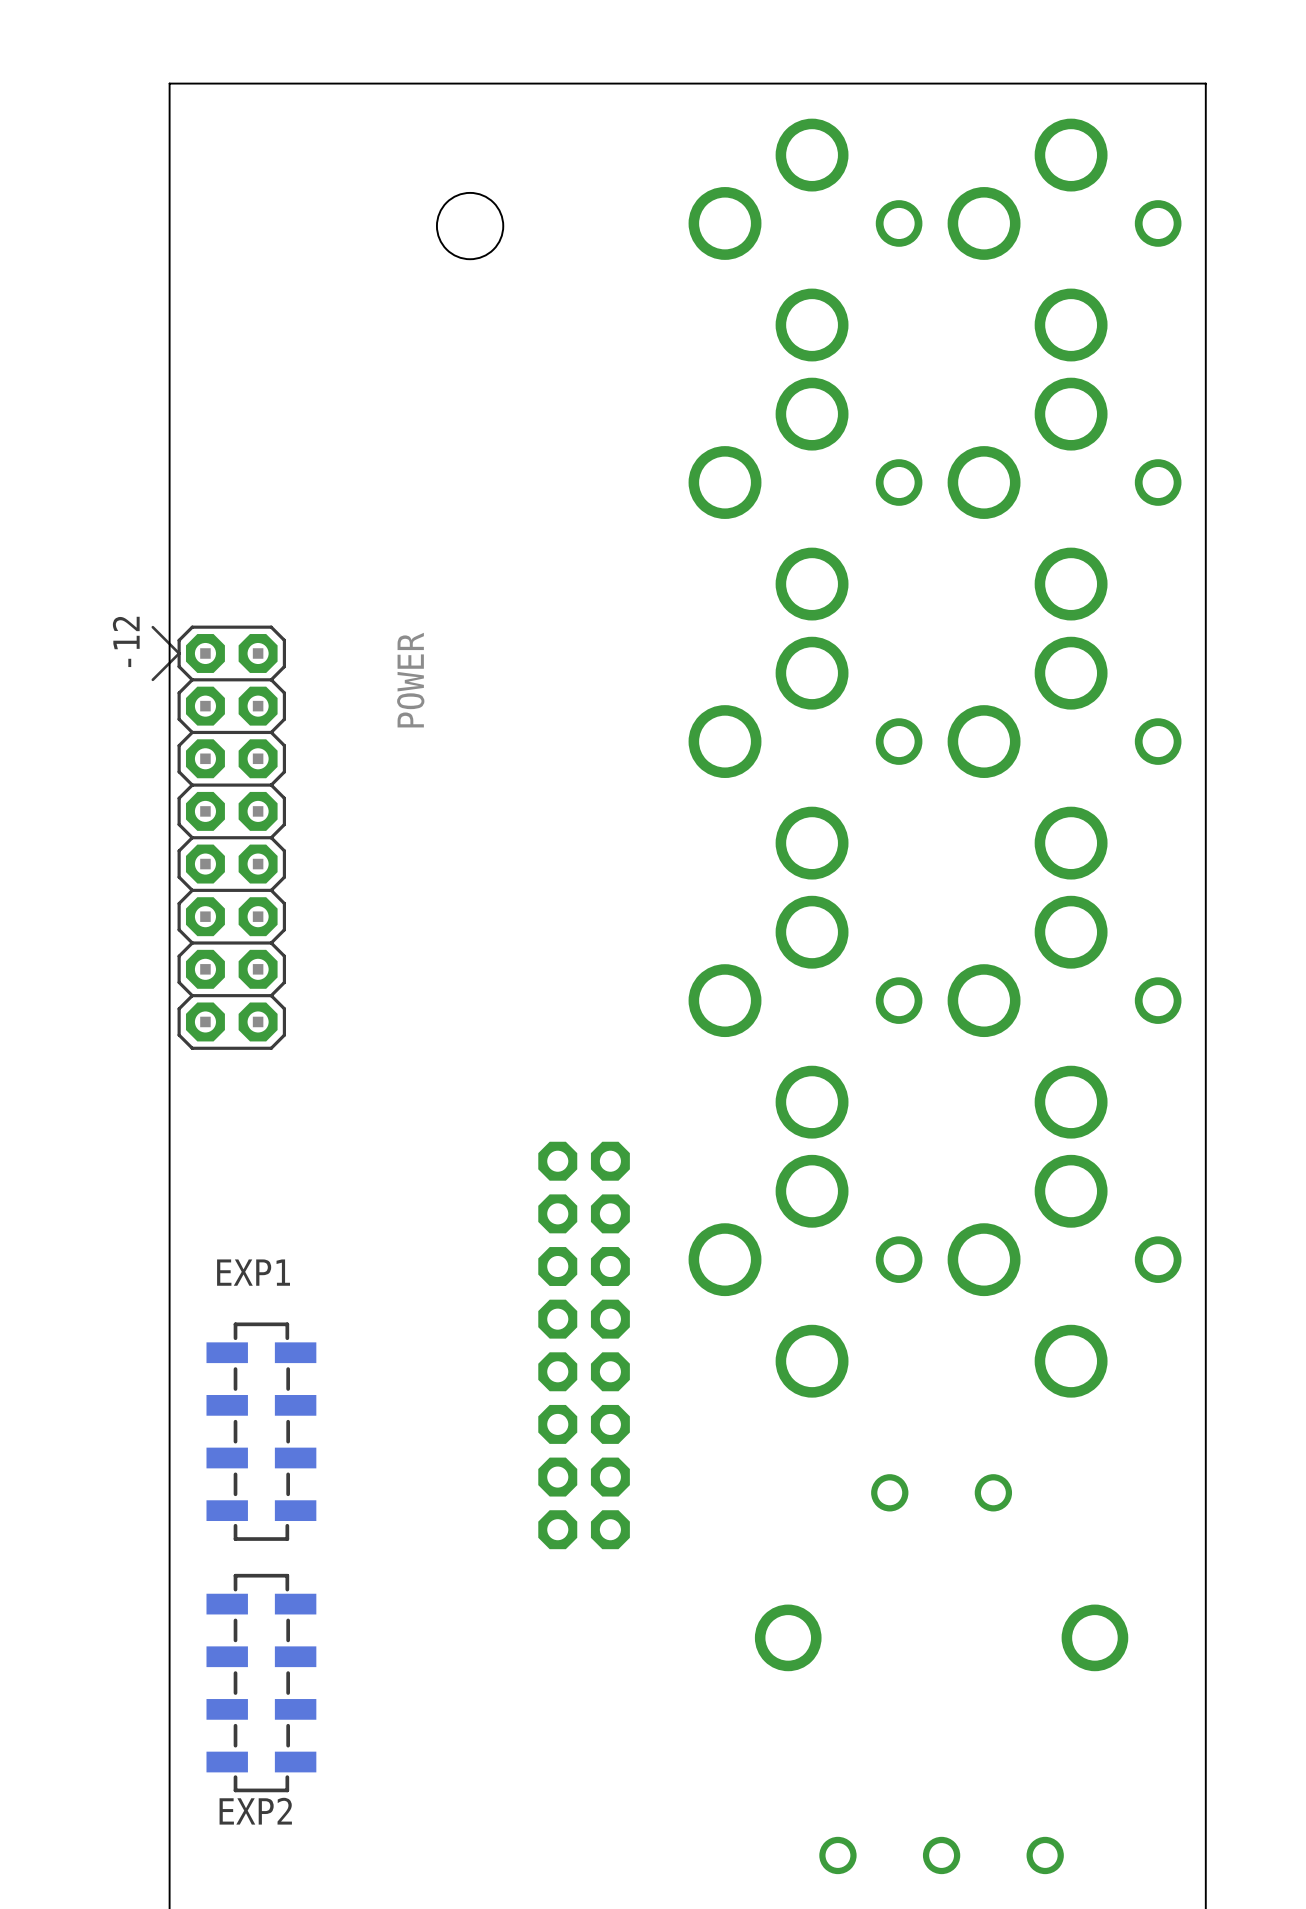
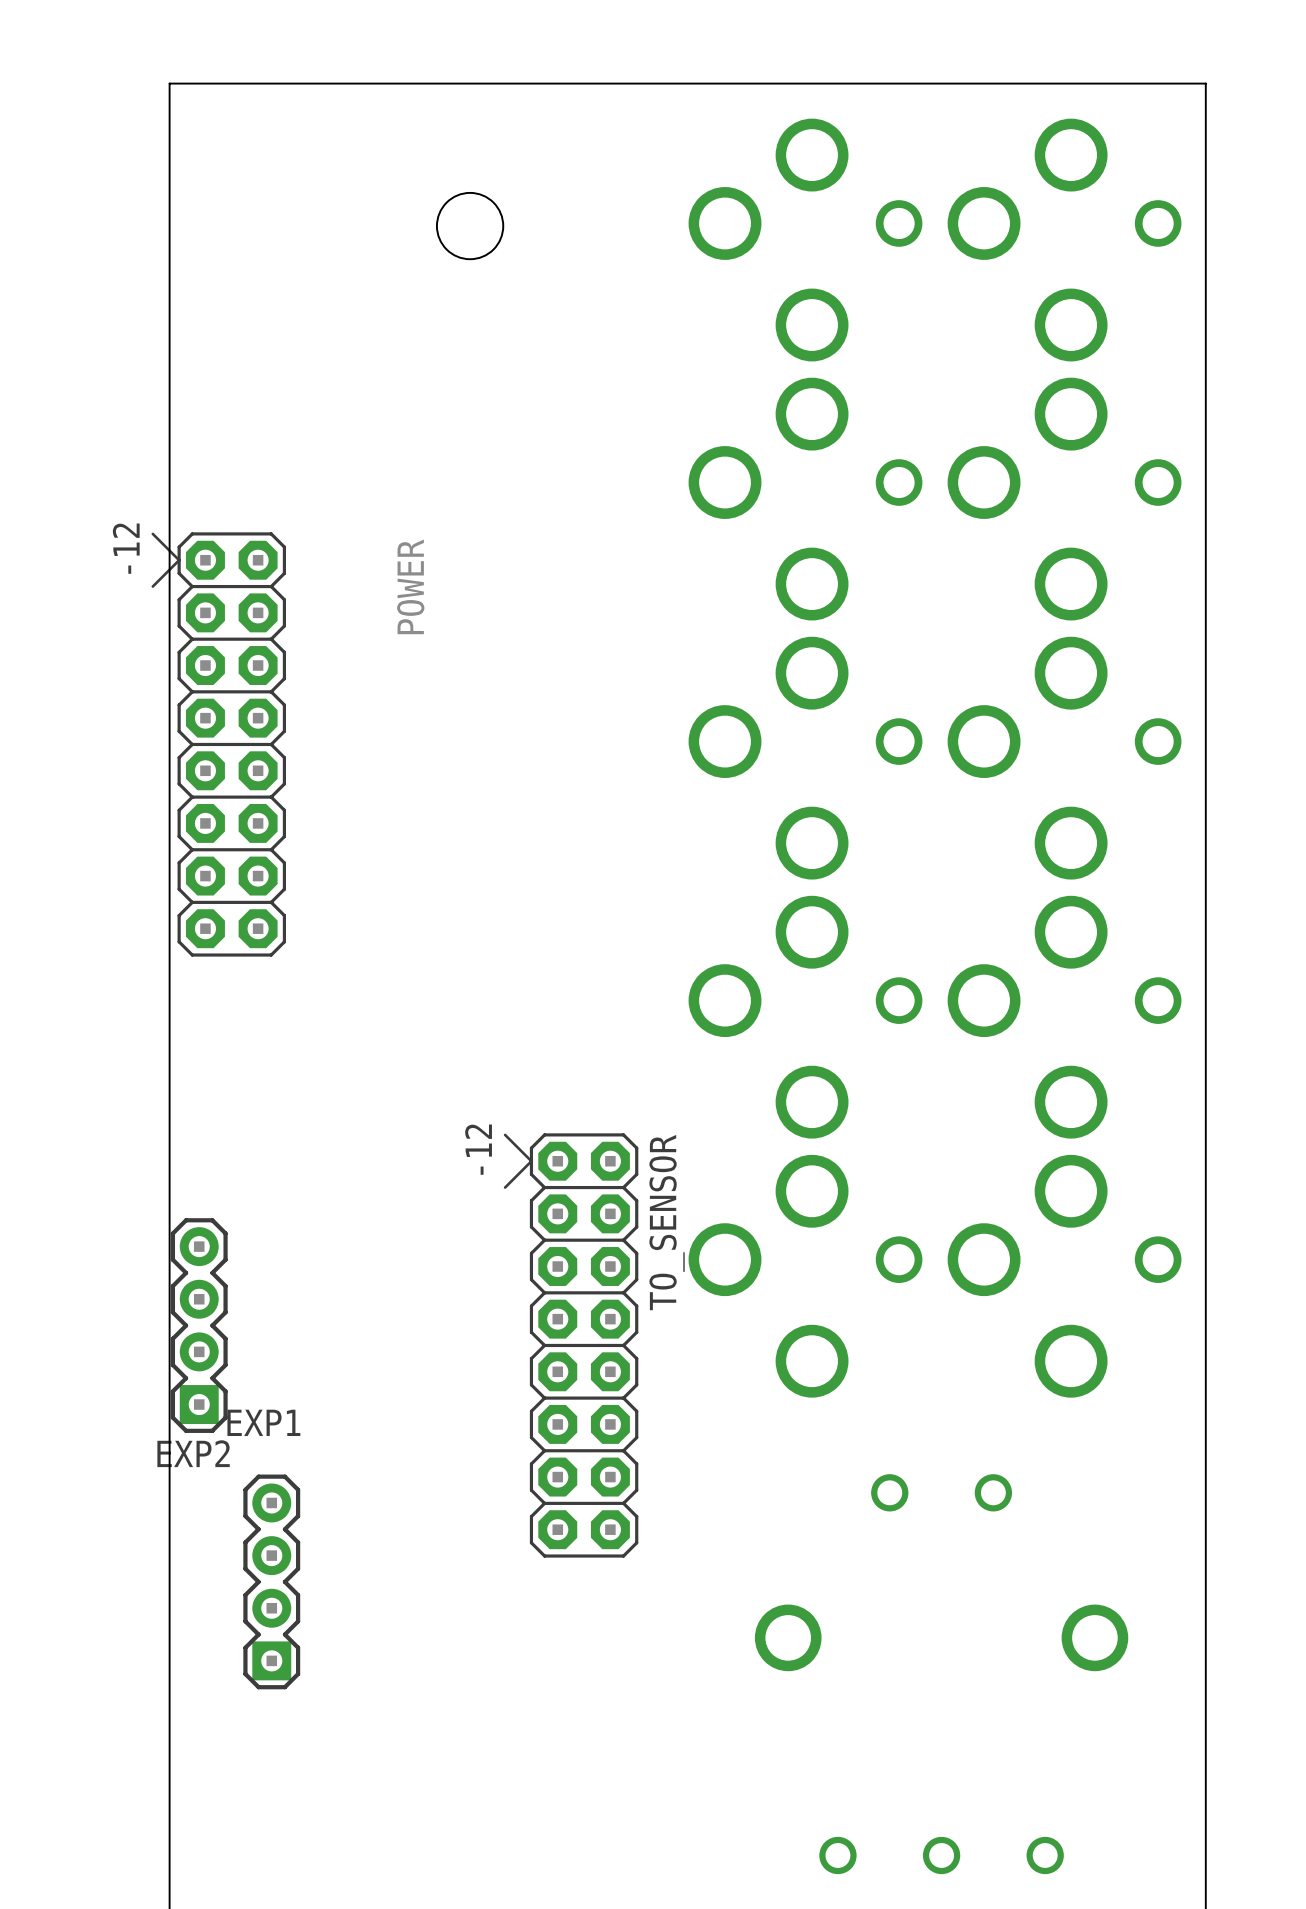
POWER position: (218, 837) -> (218, 744)
EXP1 footprint: [206, 1322, 317, 1541] -> [243, 1474, 301, 1690]
TO_SENSOR: none -> (571, 1345)
part: (584, 1345) -> none
EXP2 footprint: [206, 1573, 317, 1793] -> [170, 1218, 228, 1433]

